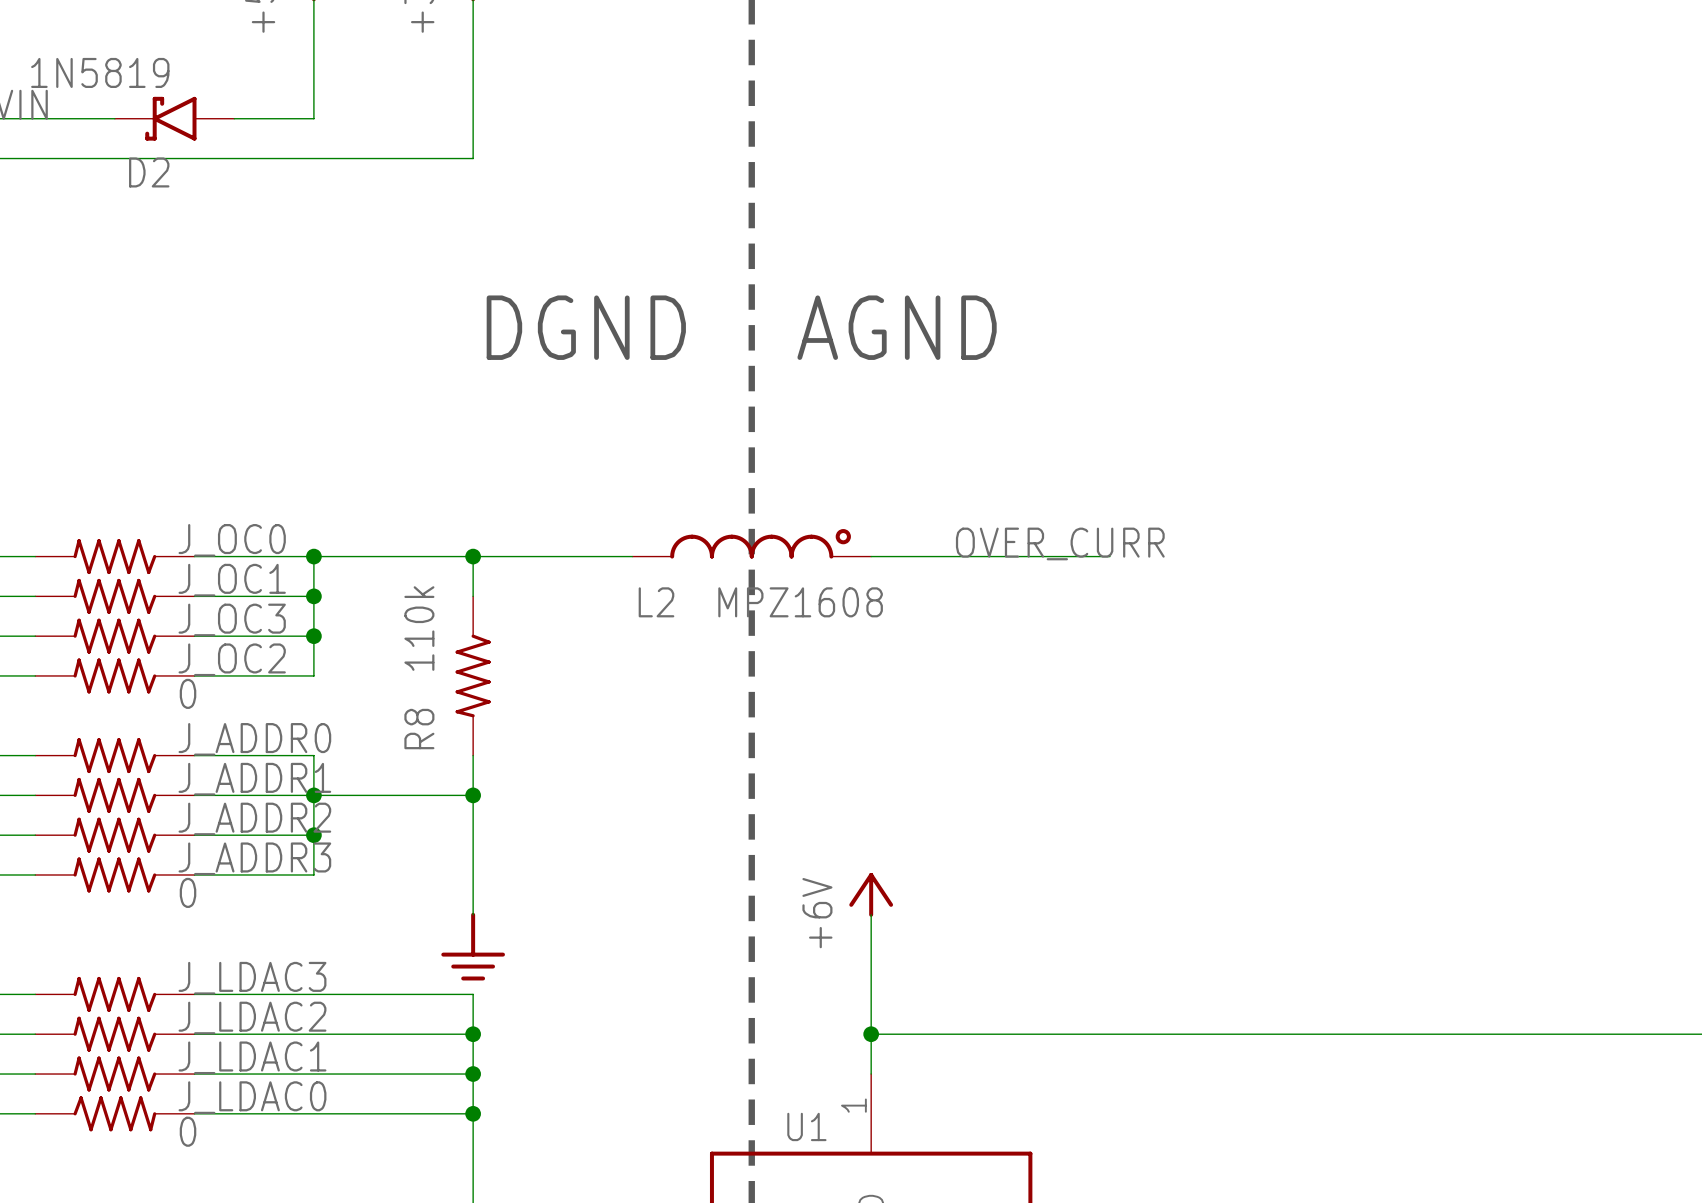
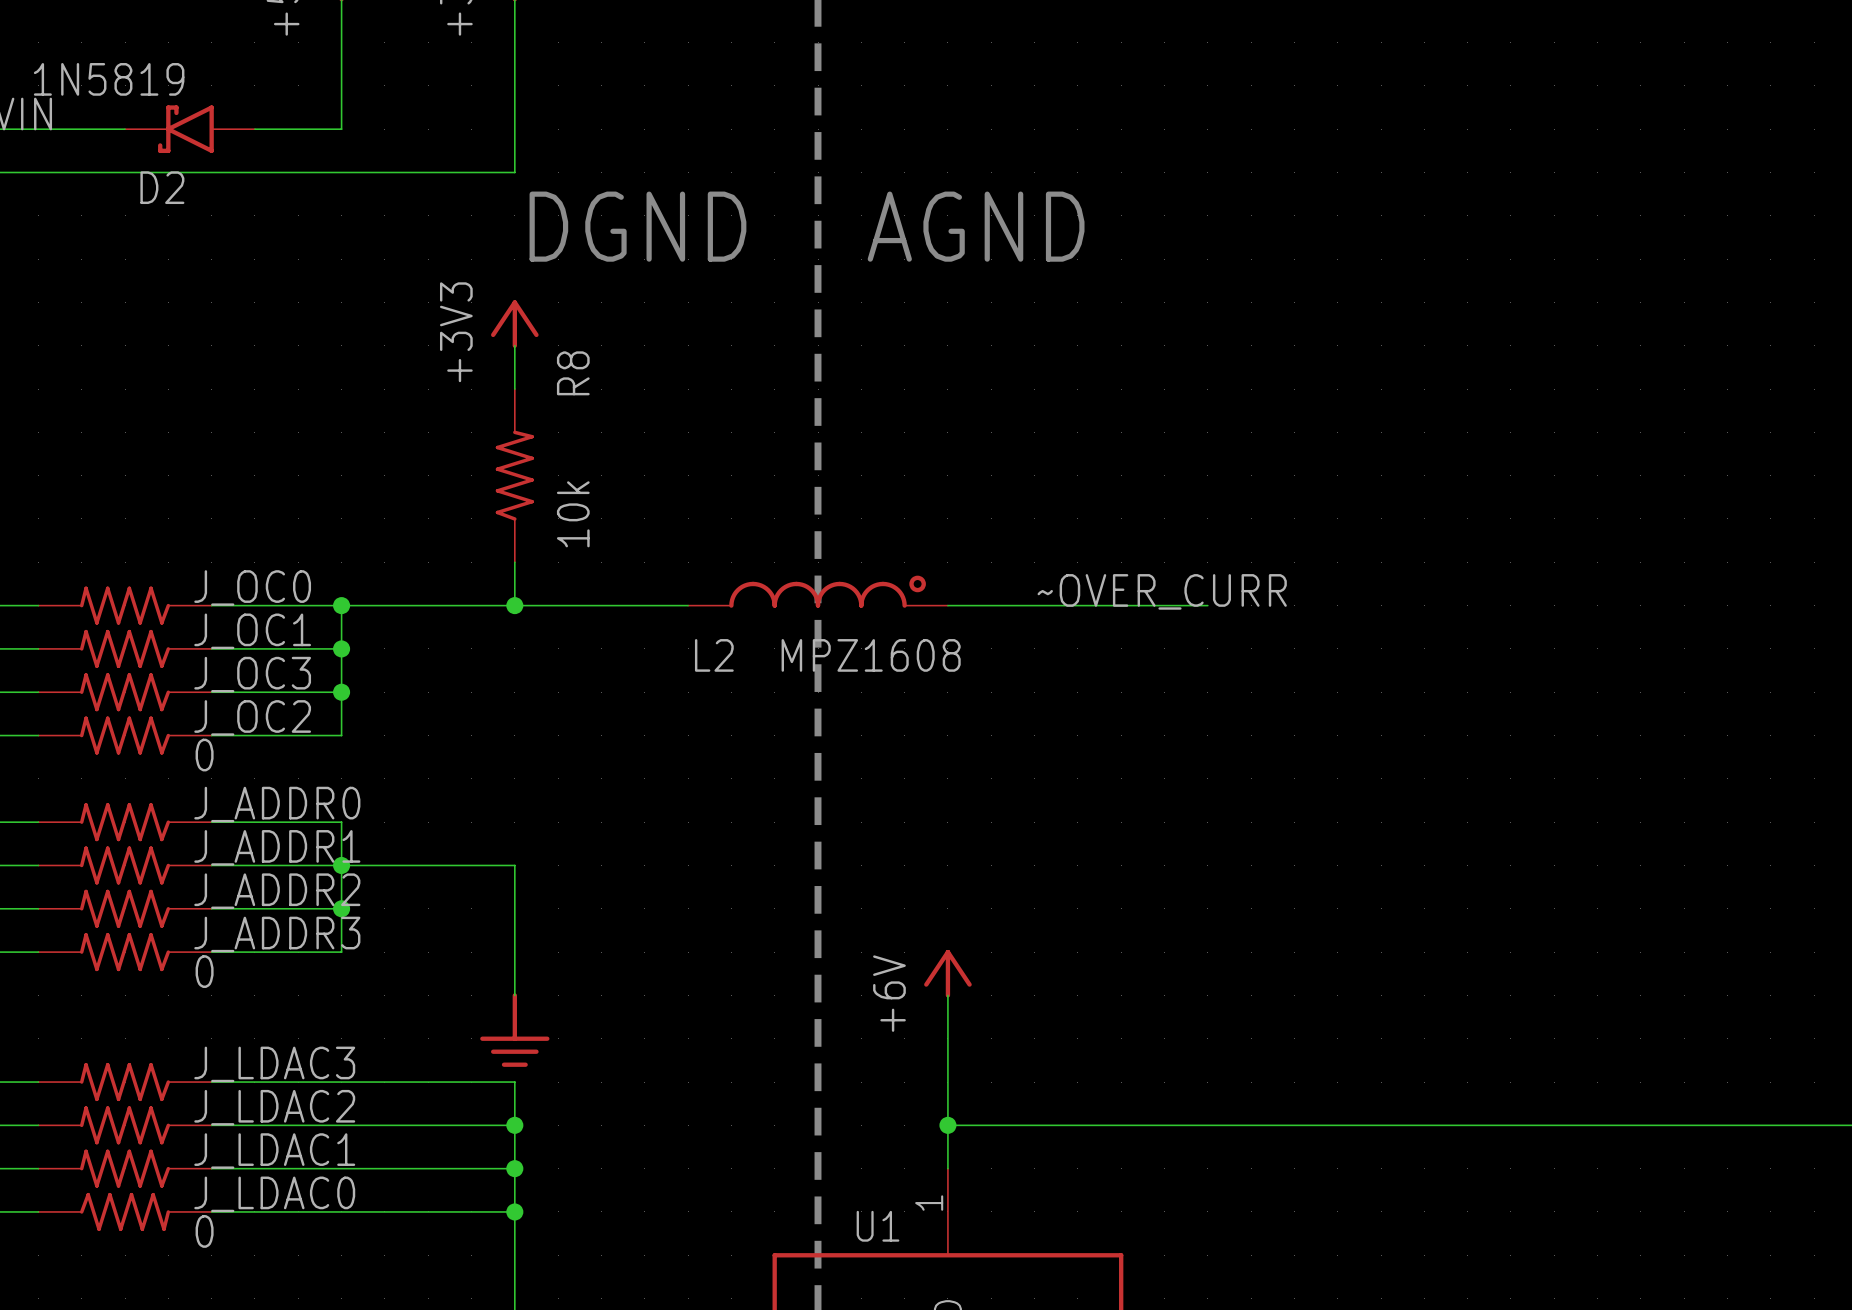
part: none -> +3V3 (514, 324)
wire: none -> (514, 345) (514, 389)
text position: DGND (586, 327) -> DGND (637, 226)
text position: AGND (897, 327) -> AGND (976, 226)
label: OVER_CURR (1060, 543) -> ~OVER_CURR (1162, 591)
wire: (473, 556) (473, 596) -> (514, 605) (514, 562)
R8 value: 110k (419, 628) -> 10k (573, 514)
R8 rotation: 0° (473, 675) -> 180° (514, 475)
R8 position: (473, 675) -> (514, 475)
R8 name position: R8 (419, 729) -> R8 (573, 373)
wire: (473, 755) (473, 795) -> none
junction: (473, 795) -> none

